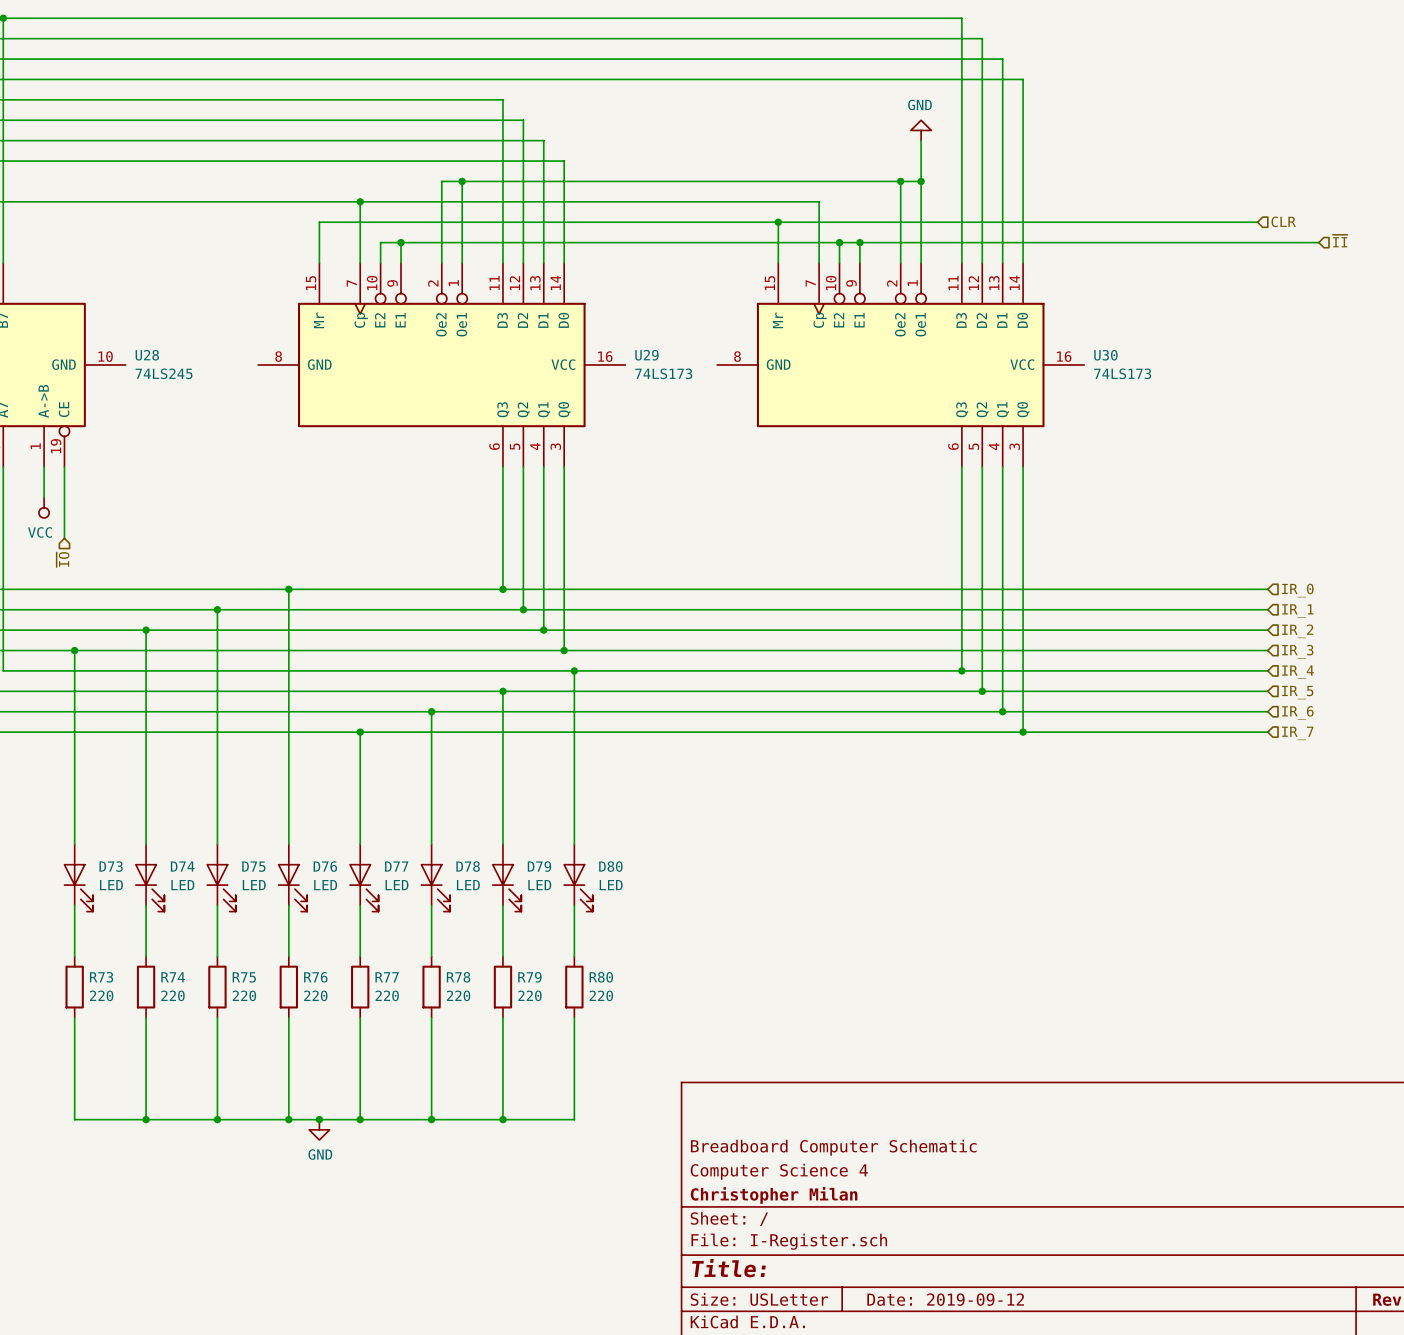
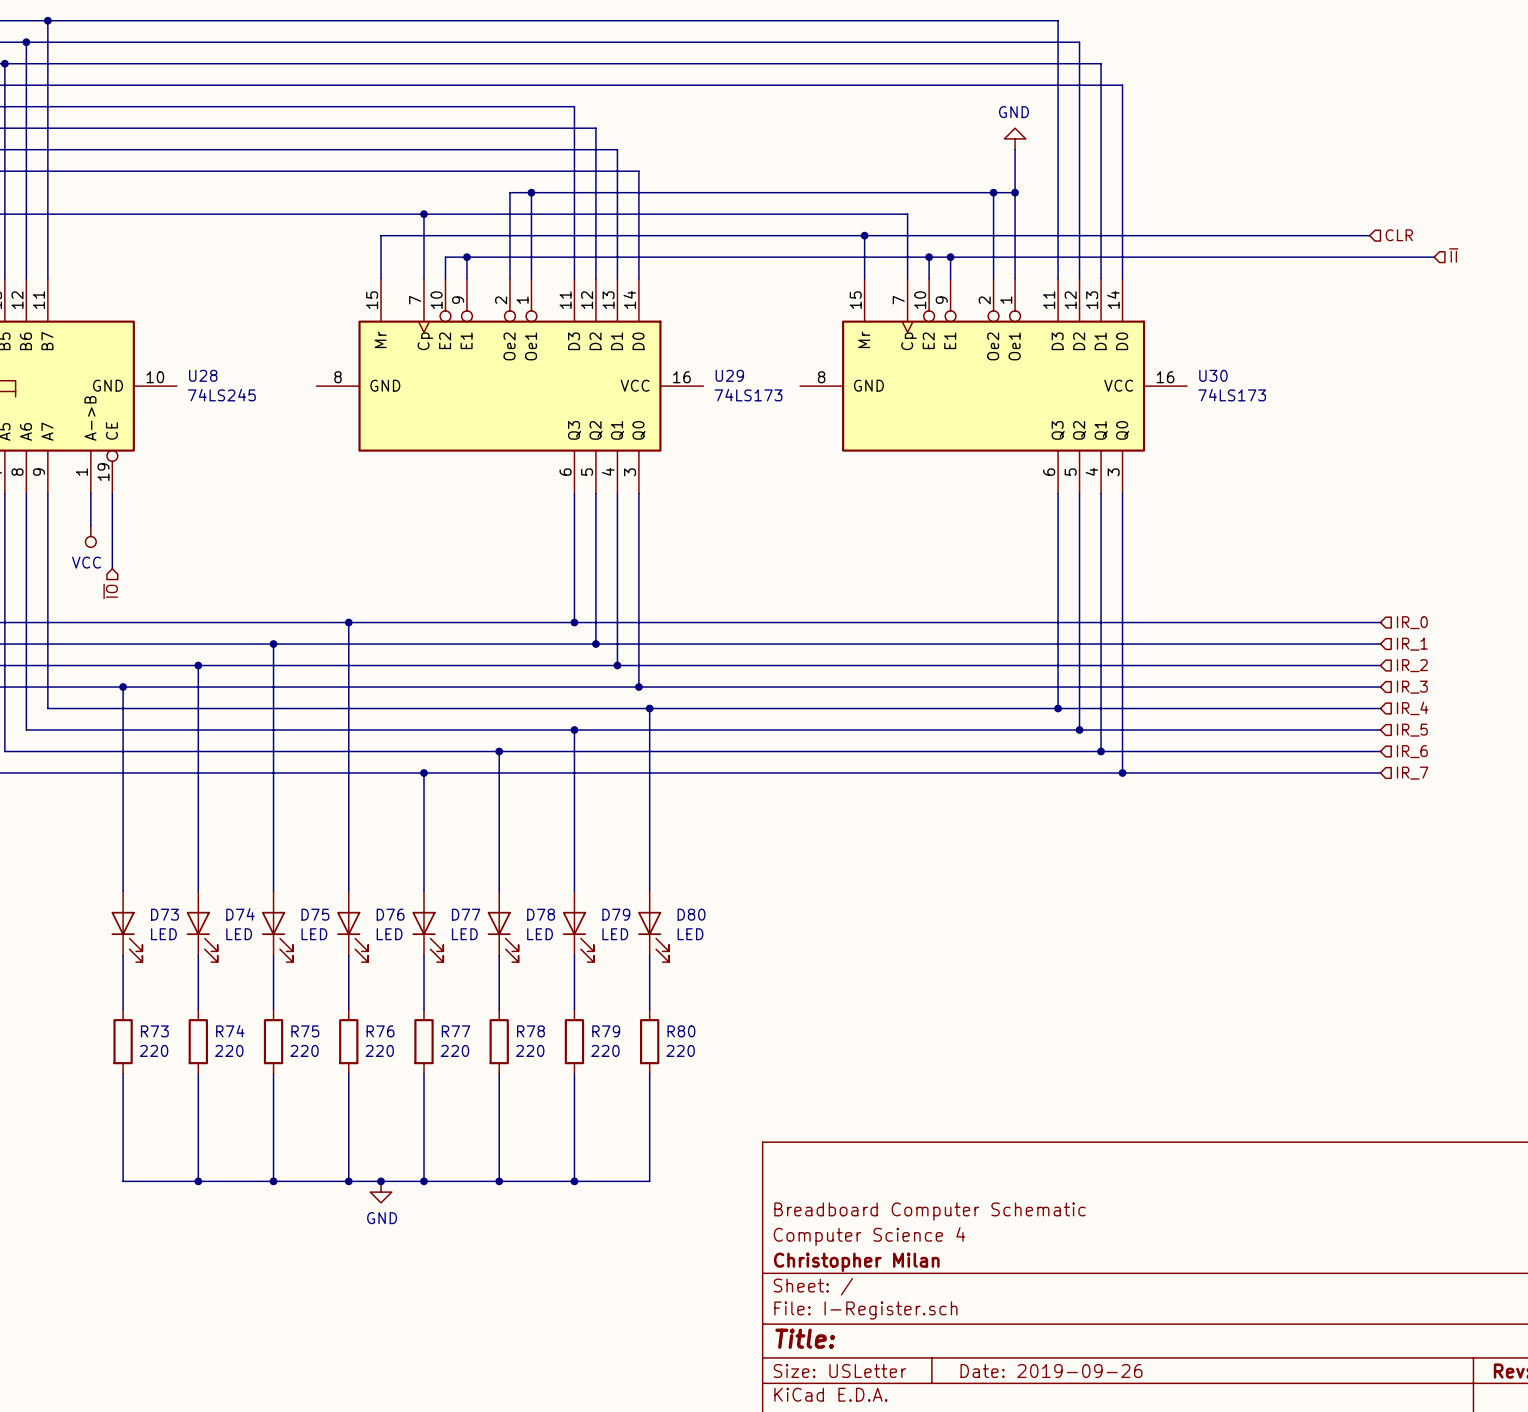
title block: Date: 2019-09-12 (945, 1299) -> Date: 2019-09-26 (1051, 1371)

